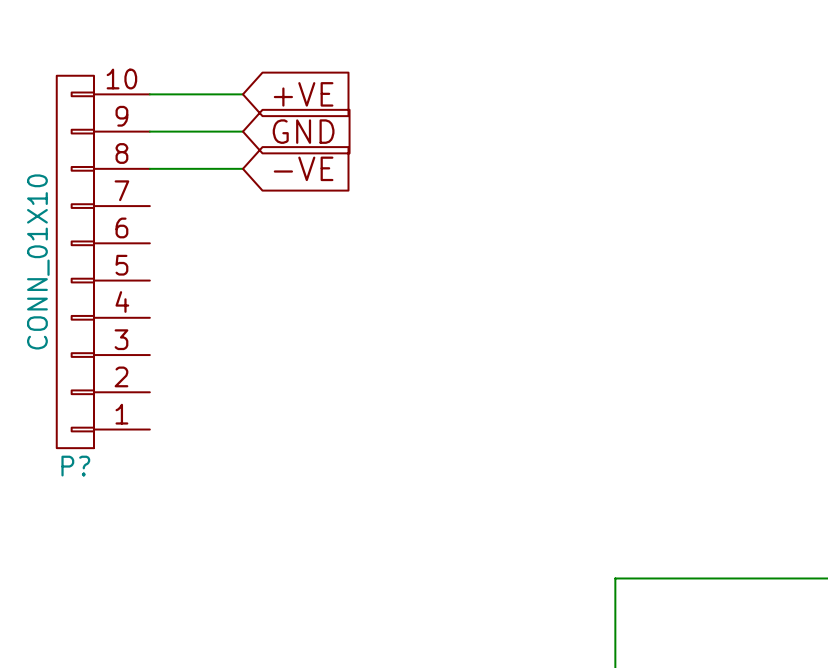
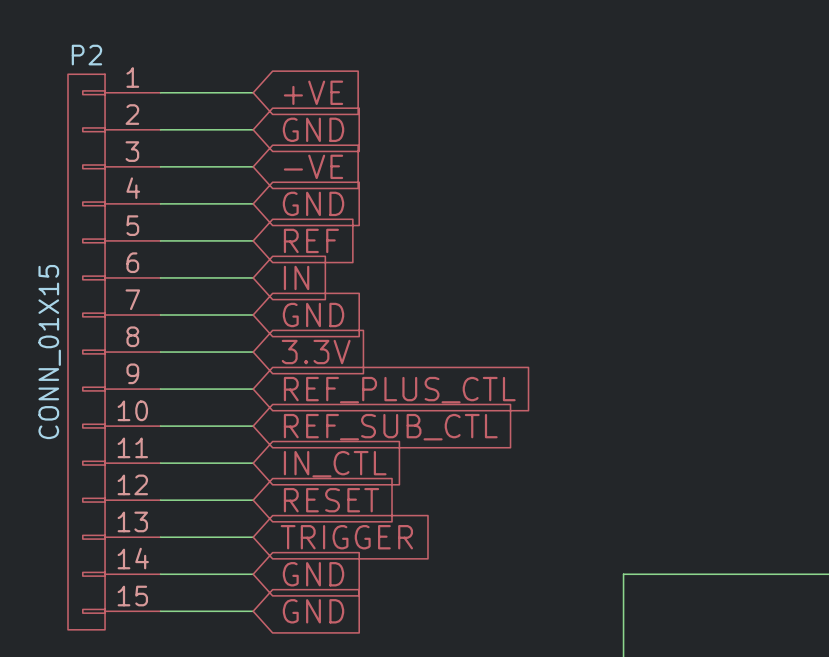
wire: none -> (160, 203) (253, 203)
global label: none -> GND (313, 203)
wire: none -> (160, 240) (253, 240)
global label: none -> REF (311, 240)
P?: CONN_01X10 (103, 261) -> none
wire: none -> (160, 277) (253, 277)
global label: none -> IN (296, 277)
wire: none -> (160, 315) (253, 315)
global label: none -> GND (313, 315)
P2: none -> CONN_01X15 (114, 352)
wire: none -> (160, 352) (253, 352)
global label: none -> 3.3V (316, 352)
wire: none -> (160, 389) (253, 389)
global label: none -> REF_PLUS_CTL (399, 390)
wire: none -> (160, 426) (253, 426)
global label: none -> REF_SUB_CTL (390, 427)
wire: none -> (160, 463) (253, 463)
global label: none -> IN_CTL (335, 464)
wire: none -> (160, 500) (253, 500)
global label: none -> RESET (331, 500)
wire: none -> (160, 537) (253, 537)
global label: none -> TRIGGER (346, 537)
wire: none -> (160, 574) (253, 574)
global label: none -> GND (313, 574)
wire: none -> (160, 611) (253, 611)
global label: none -> GND (313, 611)

